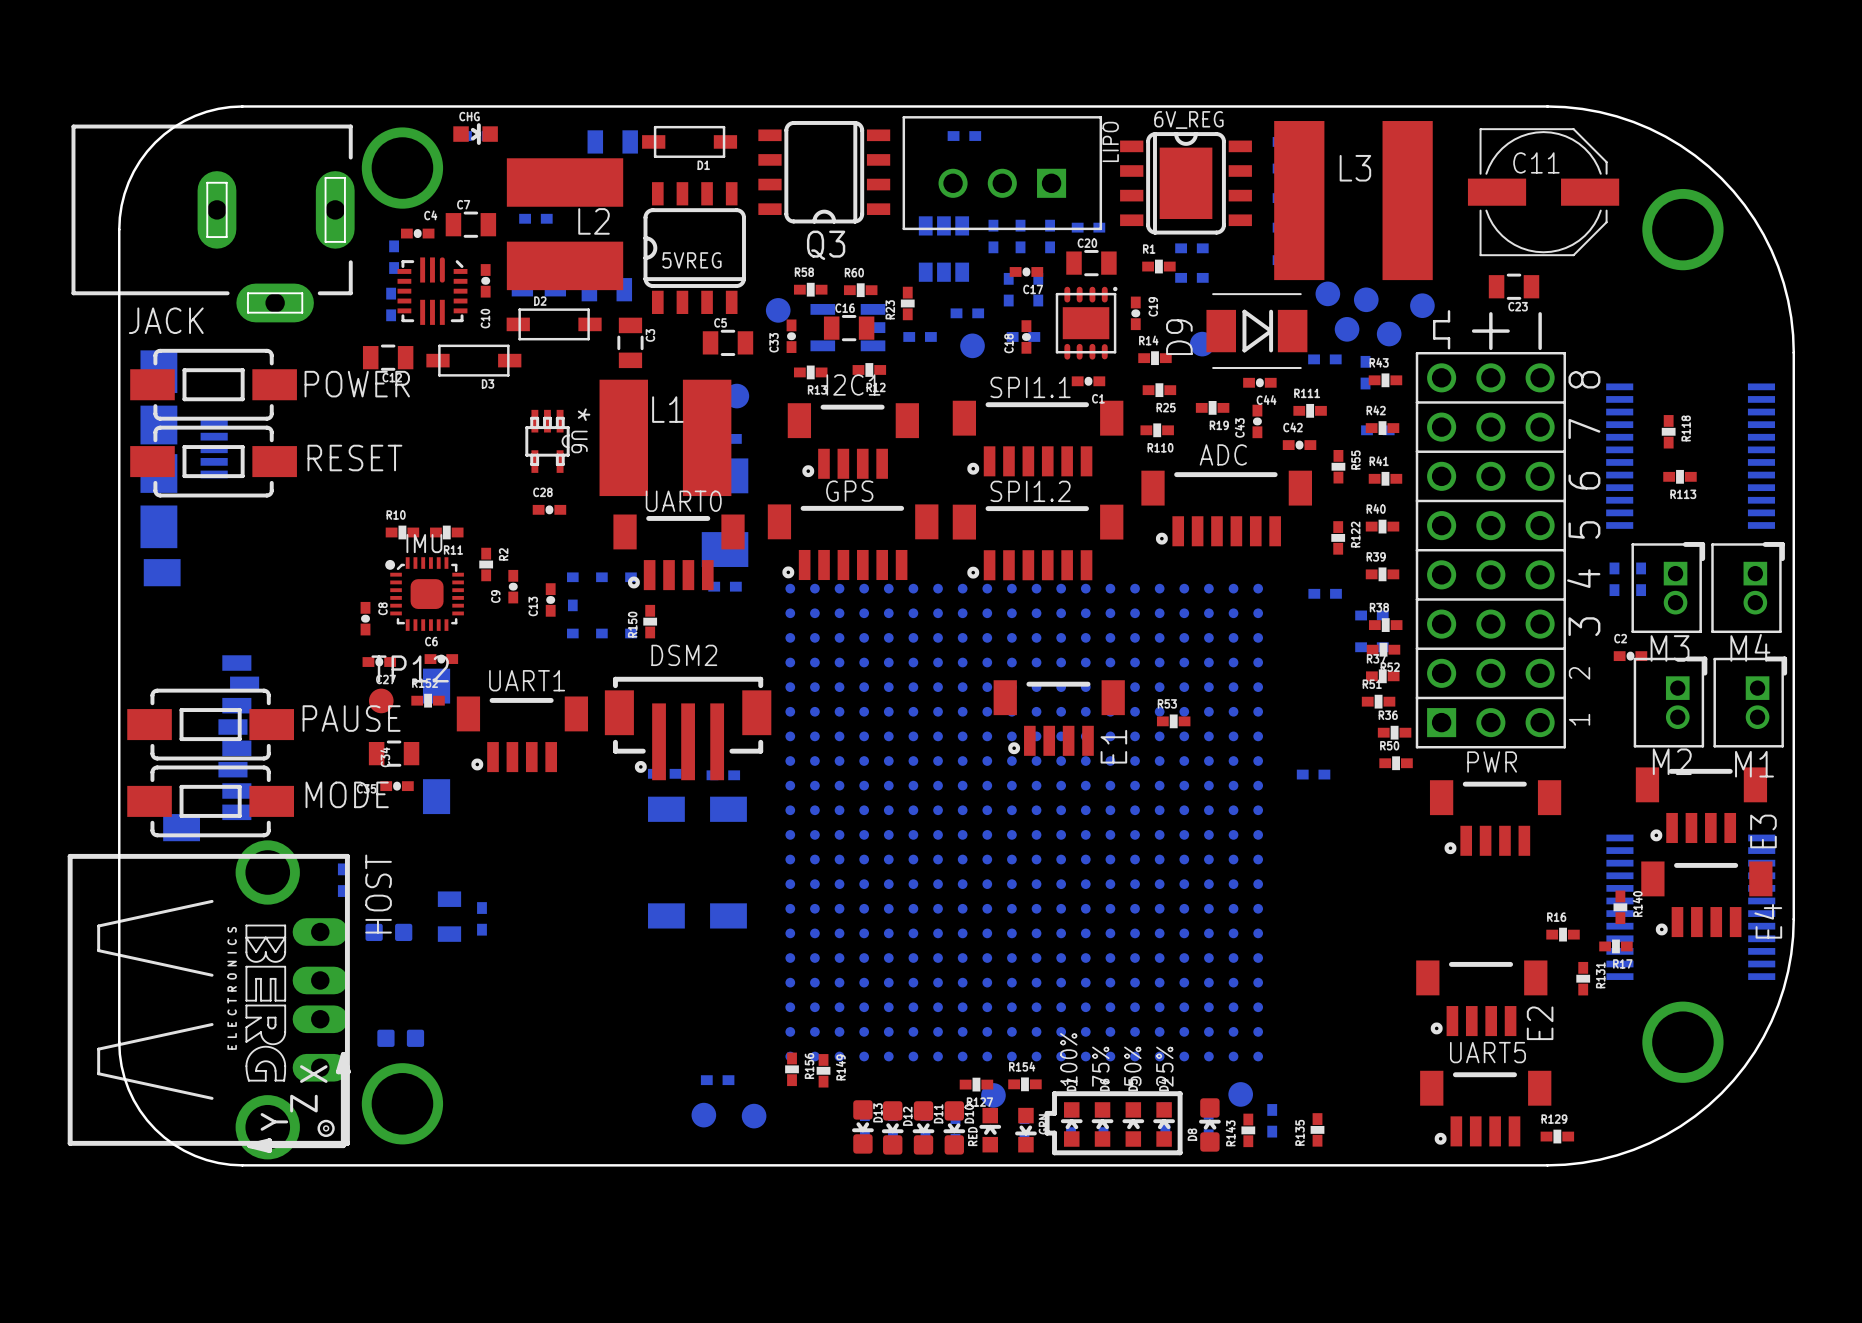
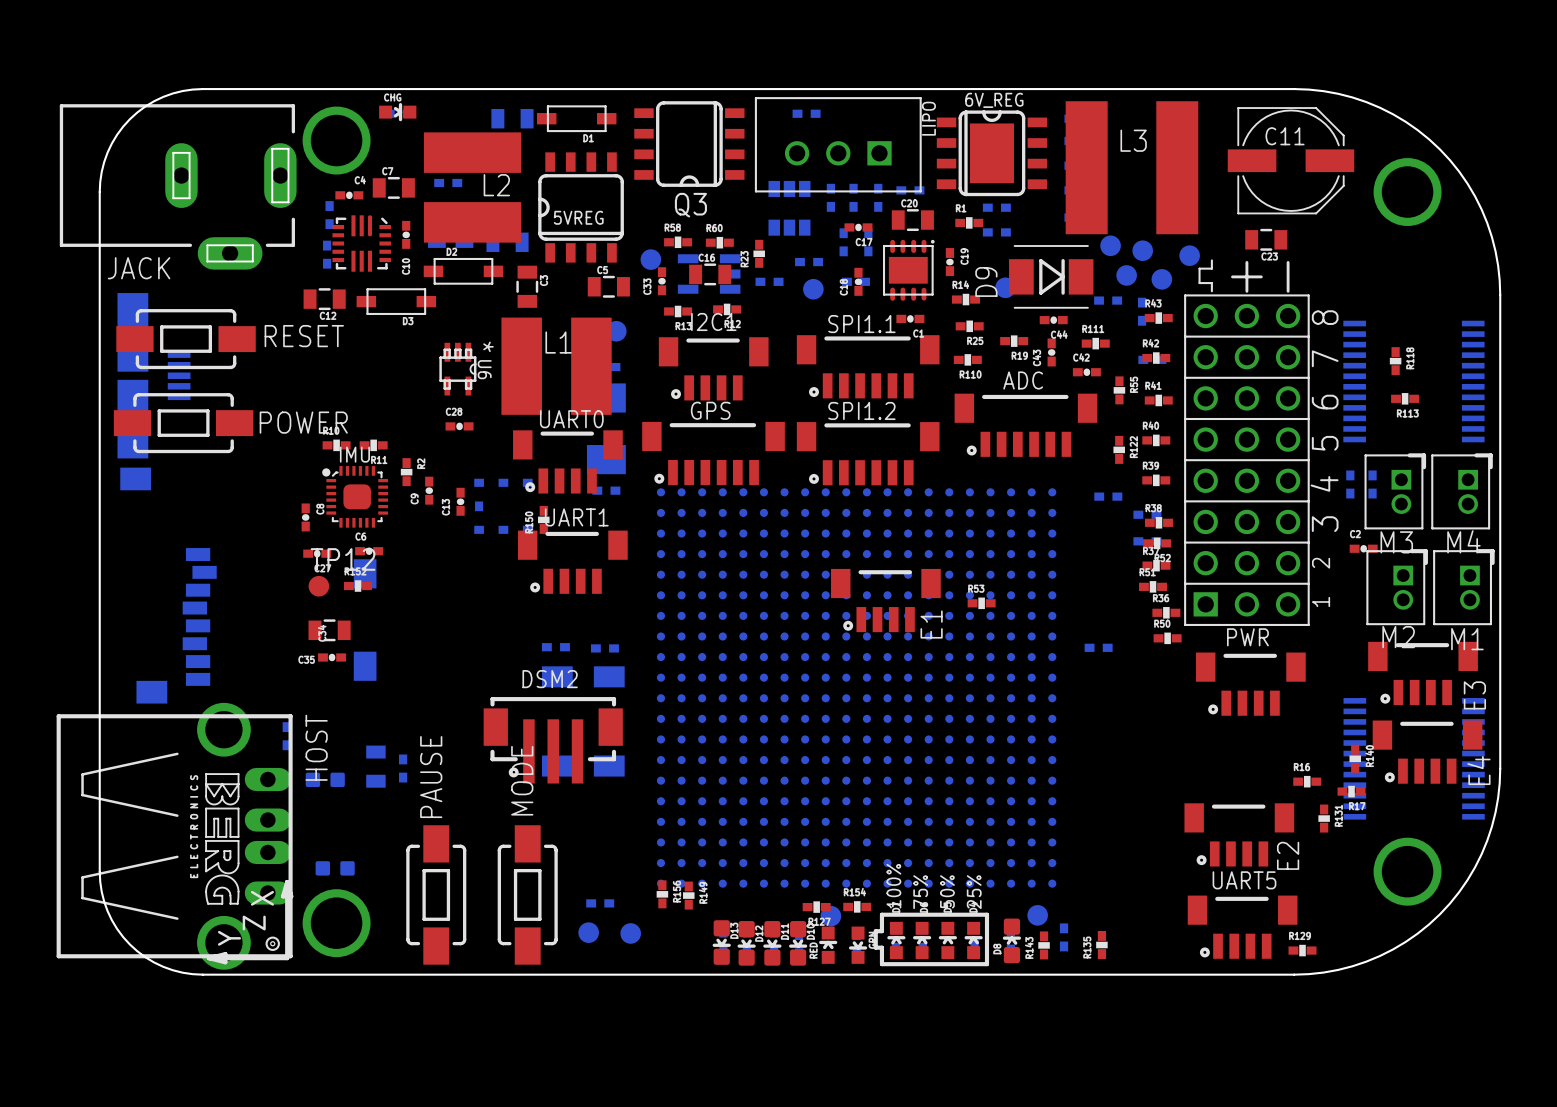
POWER position: (213, 384) -> (183, 423)
RESET position: (213, 461) -> (186, 339)
PAUSE name position: PAUSE (351, 718) -> PAUSE (431, 777)
PAUSE rotation: 0° (210, 724) -> 90° clockwise (436, 894)
PAUSE position: (210, 724) -> (436, 894)
DSM2 position: (688, 728) -> (553, 740)
UART1 position: (522, 734) -> (572, 562)
MODE: (210, 801) -> none
MODE: none -> (527, 894)

